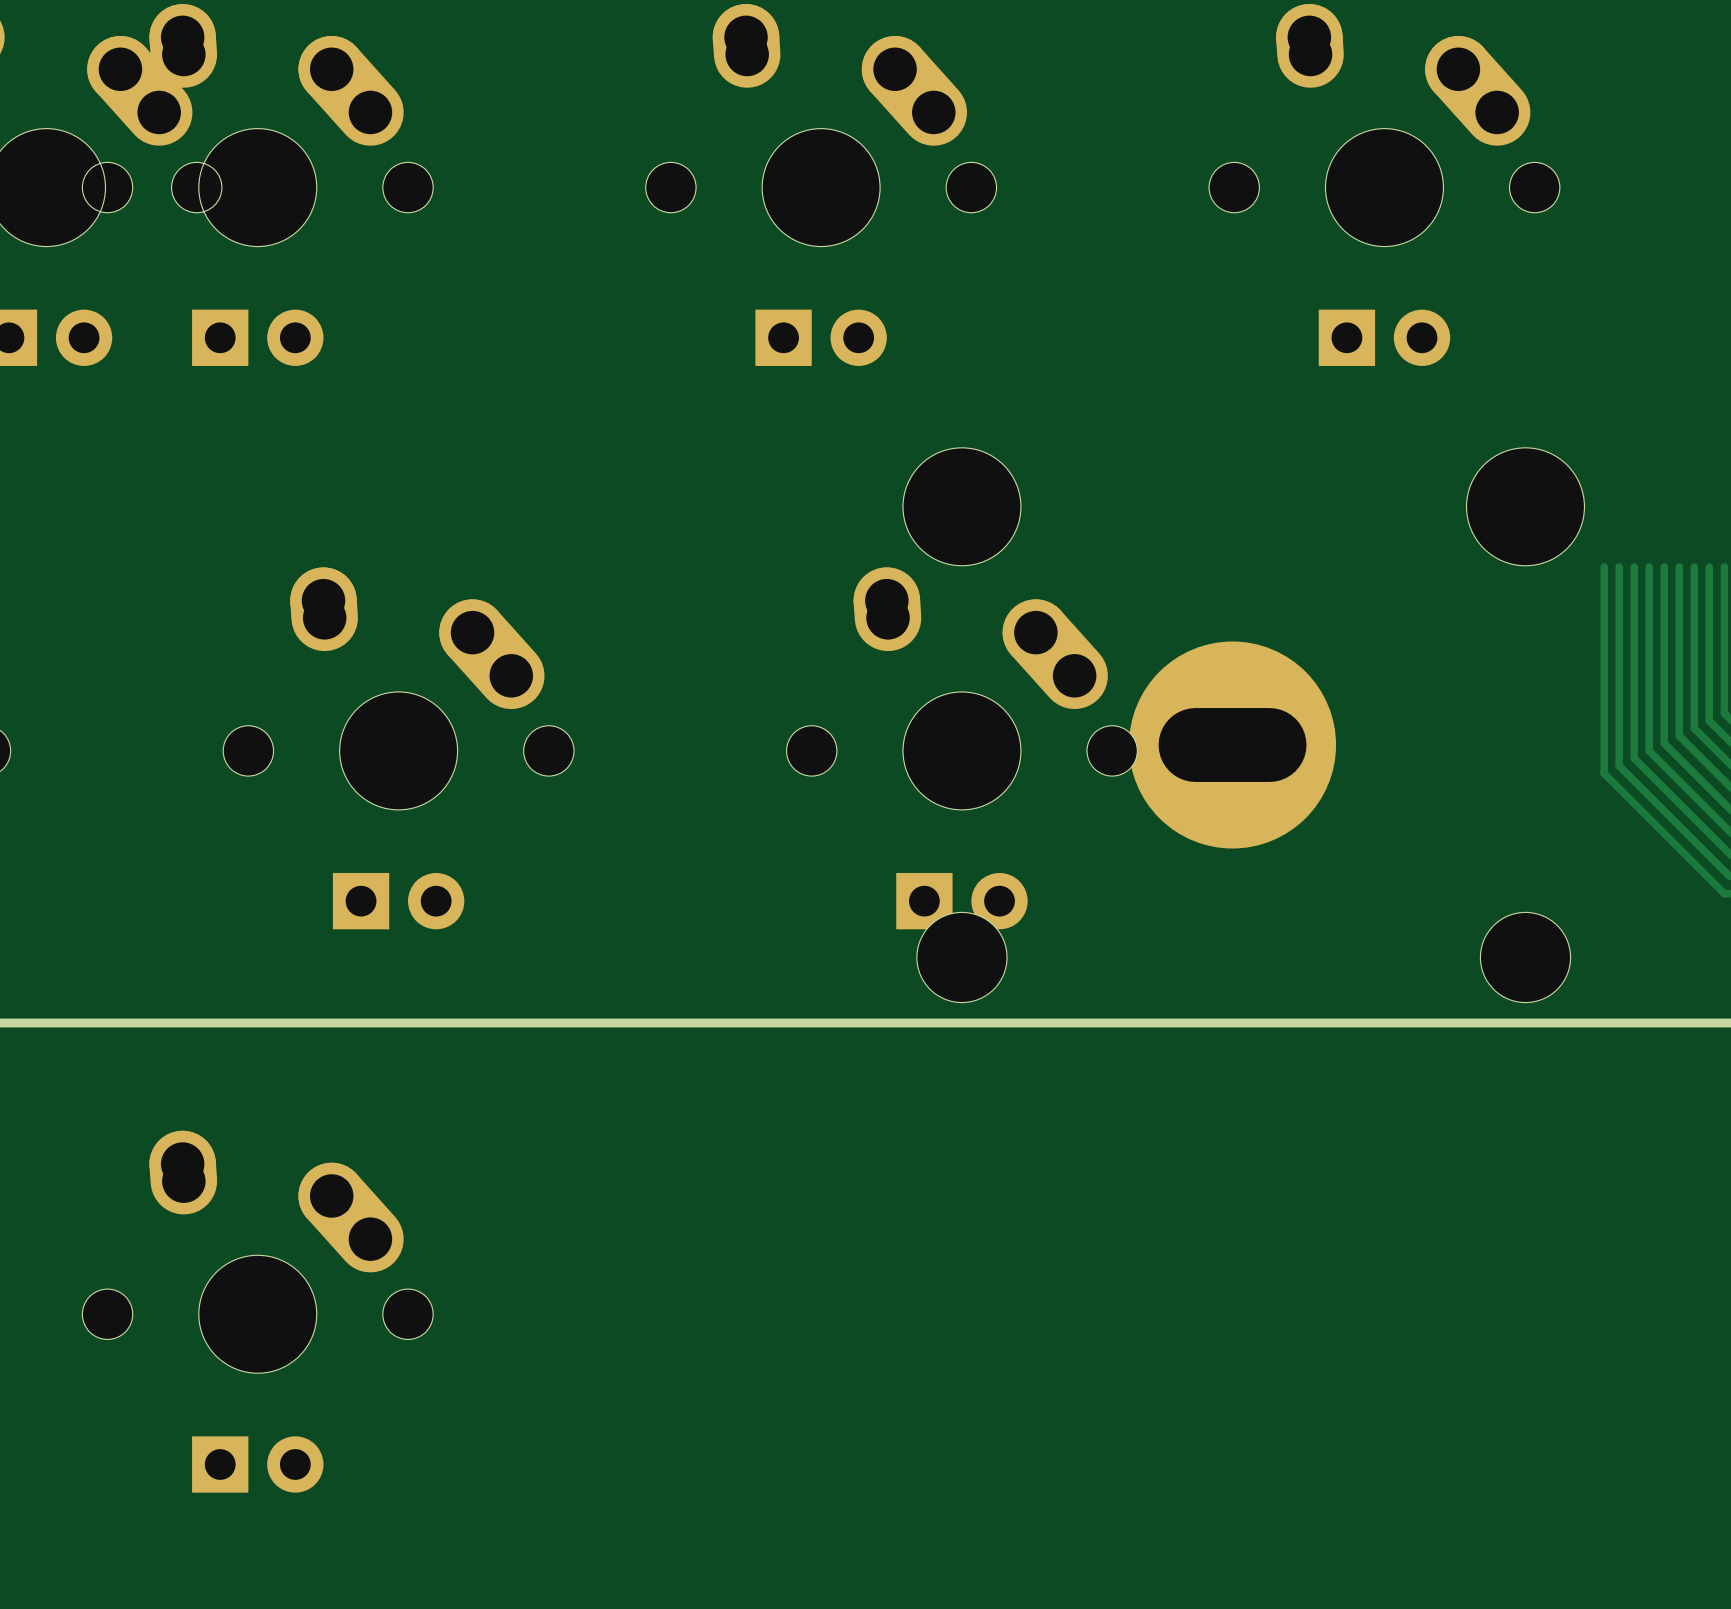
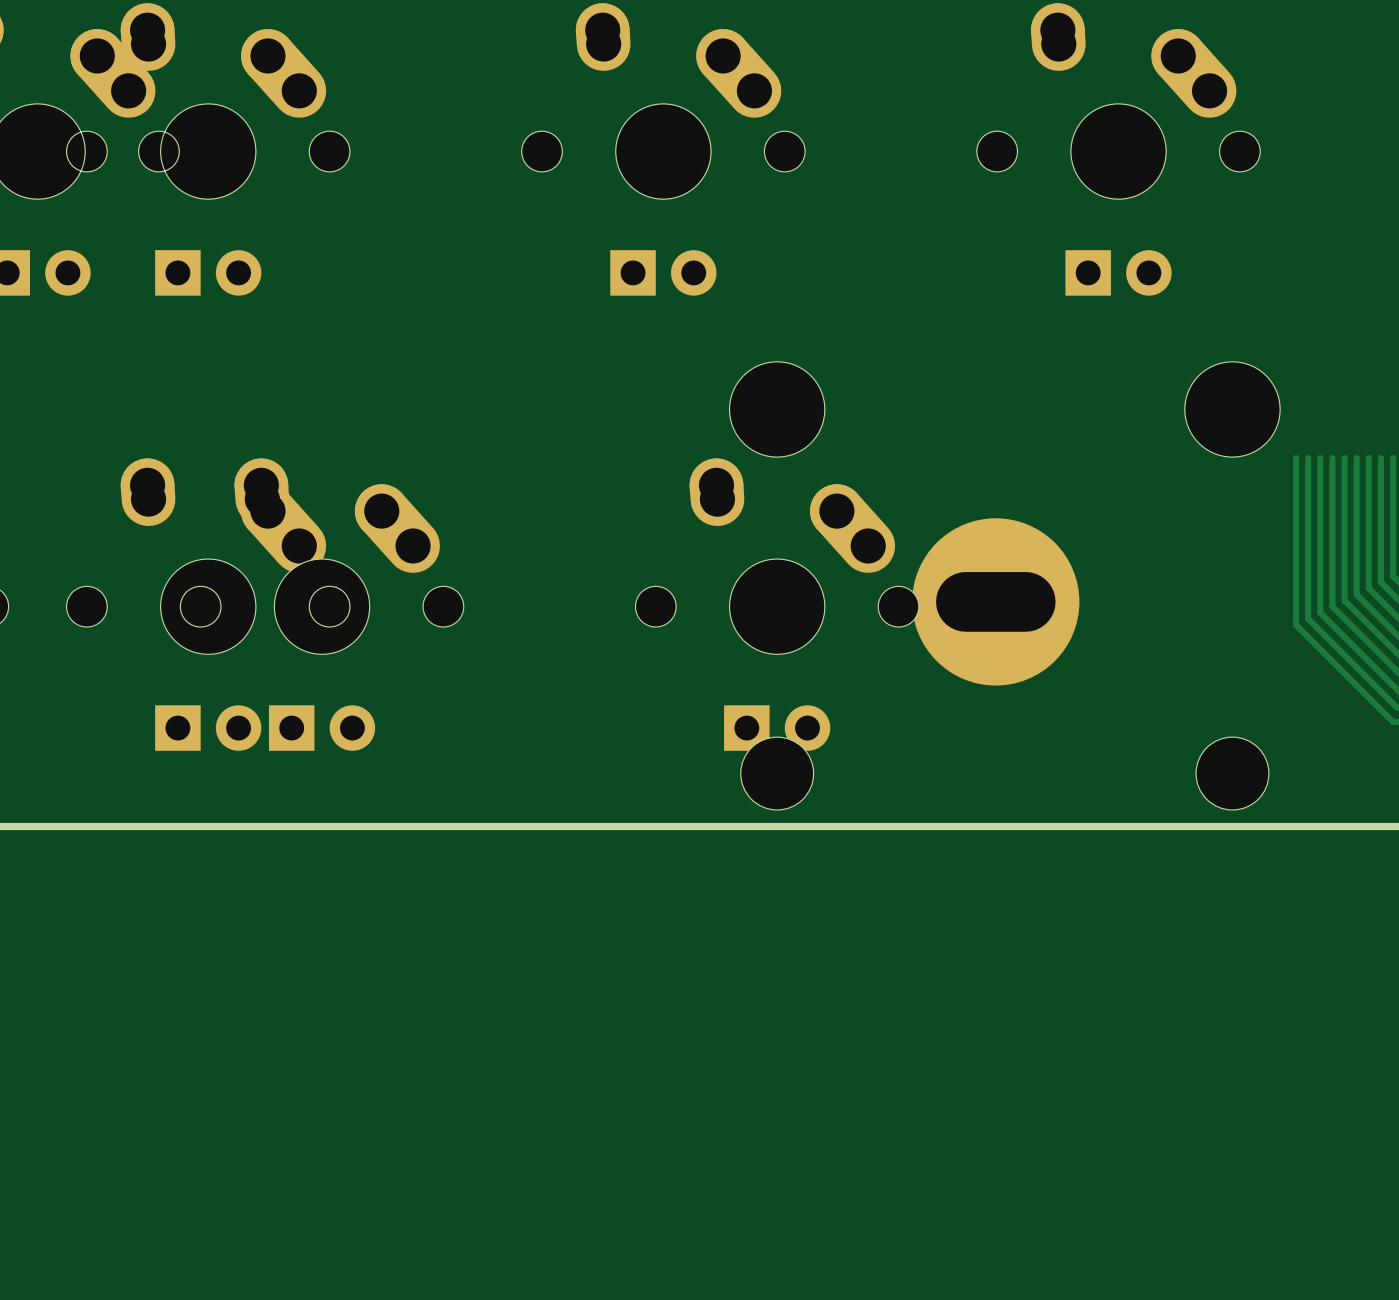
part position: (257, 1311) -> (208, 604)

